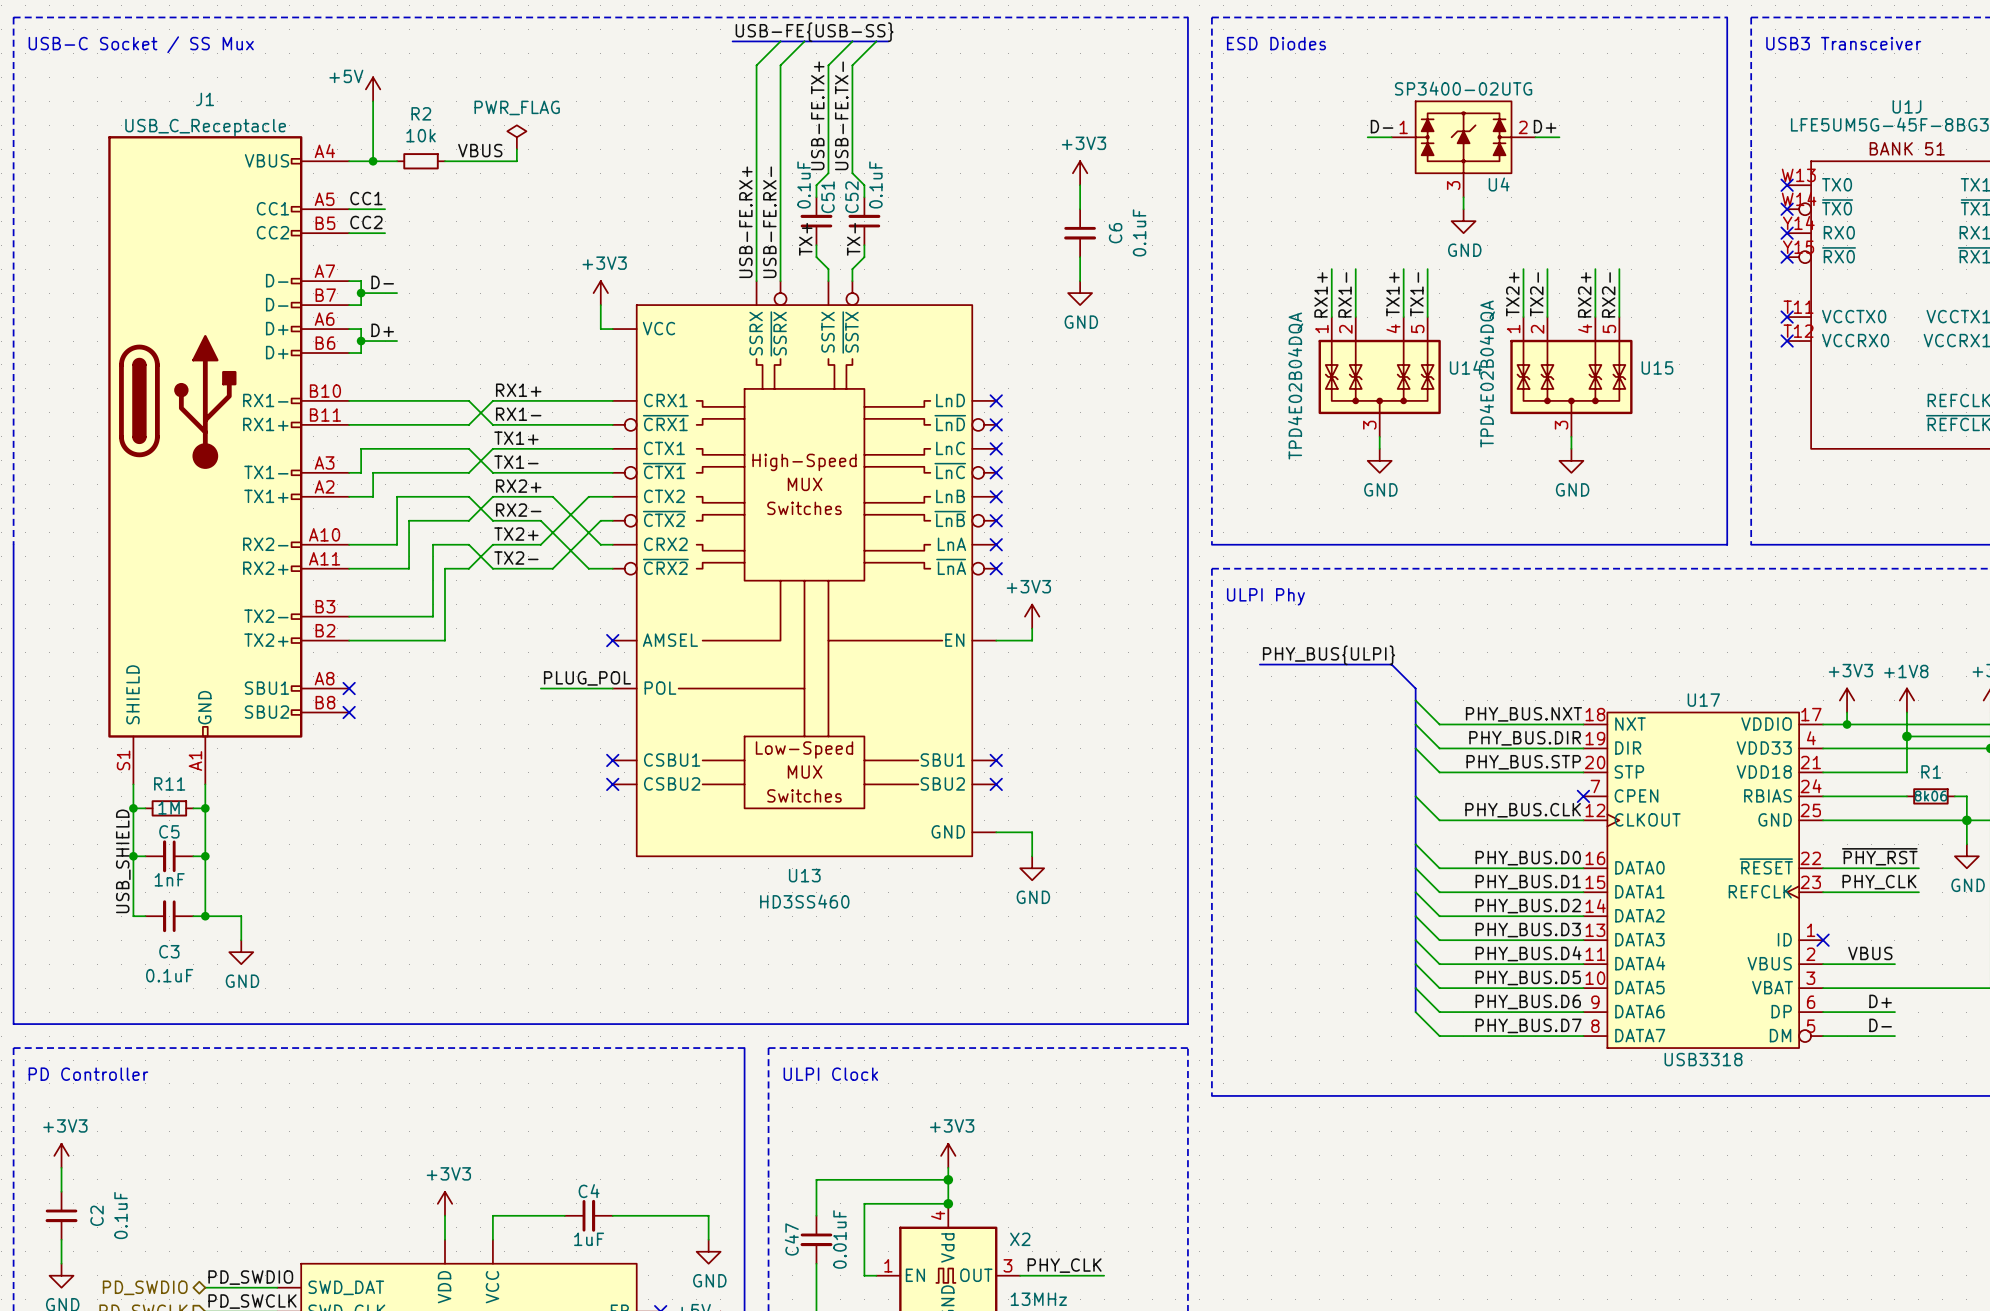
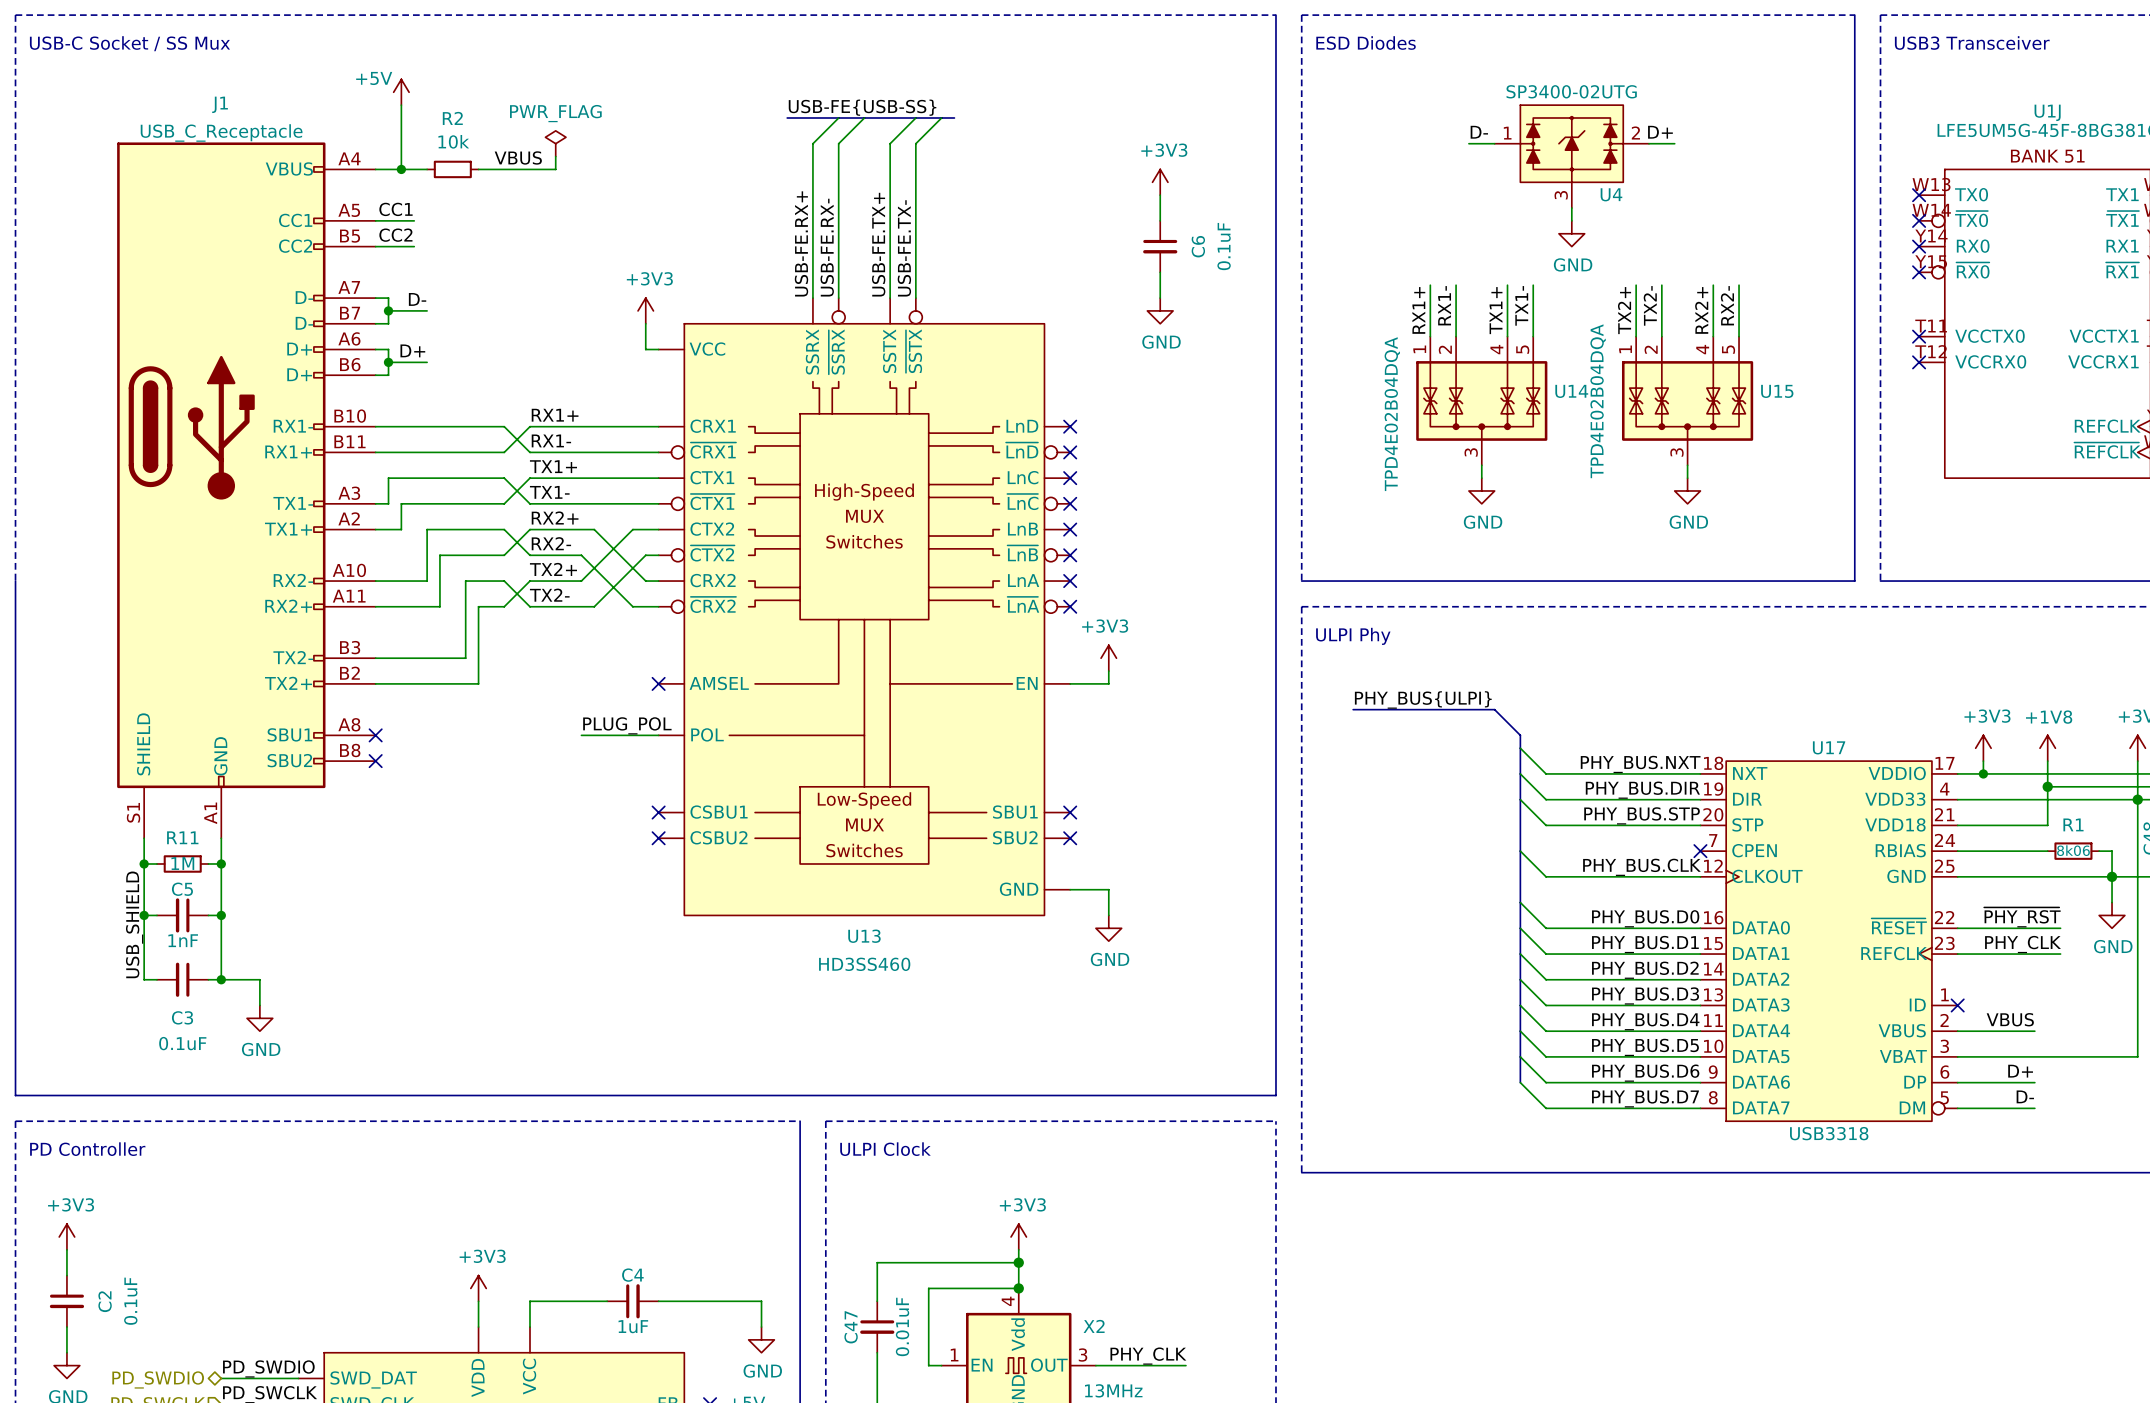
label position: USB-FE{USB-SS} (814, 32) -> USB-FE{USB-SS} (862, 107)
bus: (732, 41) (888, 41) -> (787, 117) (954, 117)
wire: (780, 41) (756, 65) (756, 137) -> (838, 117) (812, 143)
wire: (804, 41) (780, 65) (780, 137) -> (864, 117) (838, 143)
wire: (852, 41) (828, 65) (828, 137) -> (915, 117) (890, 143)
wire: (876, 41) (852, 65) (852, 137) -> (941, 117) (915, 143)
label position: USB-FE.TX+ (817, 115) -> USB-FE.TX+ (878, 244)
label position: USB-FE.TX- (841, 115) -> USB-FE.TX- (904, 248)
wire: (828, 173) (816, 185) (816, 197) -> (890, 182) (890, 285)
wire: (852, 173) (864, 185) (864, 197) -> (915, 182) (915, 285)
C51: 0.1uF (816, 221) -> none
C52: 0.1uF (864, 221) -> none
label: TX+ (805, 239) -> none
label: TX- (853, 239) -> none
wire: (816, 245) (816, 257) (828, 269) -> none
wire: (864, 245) (864, 257) (852, 269) -> none

